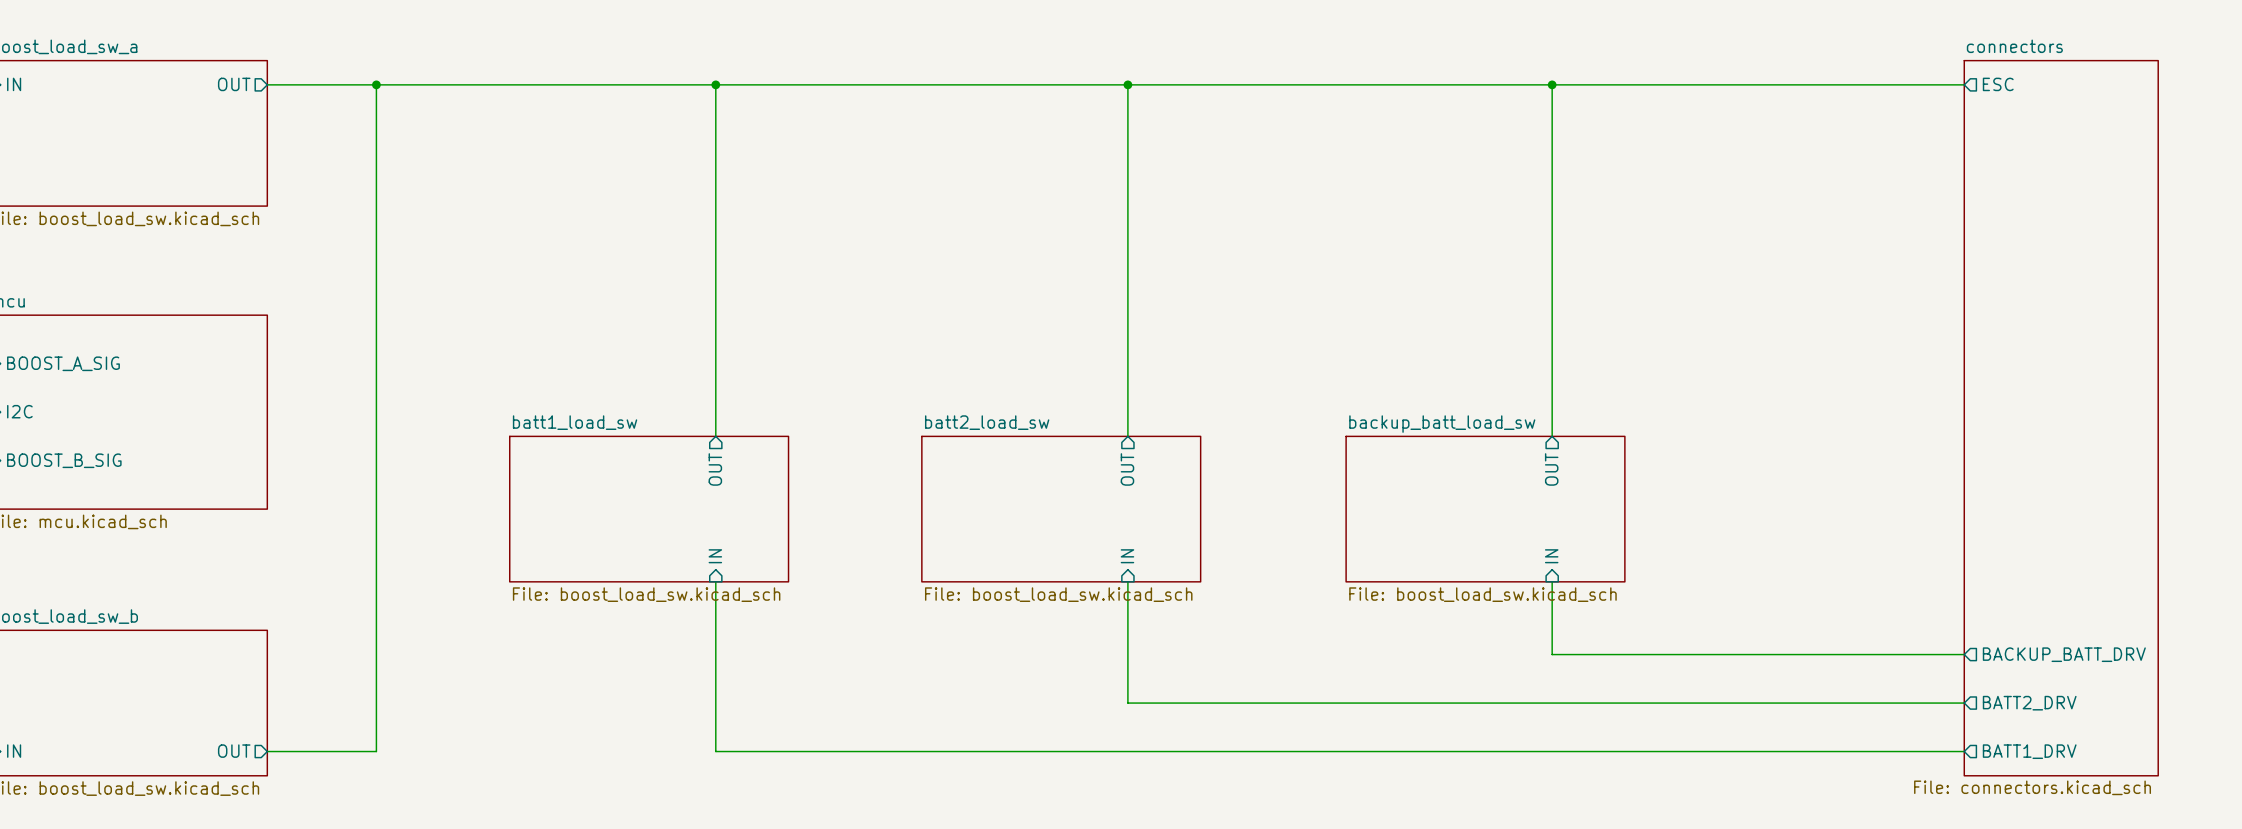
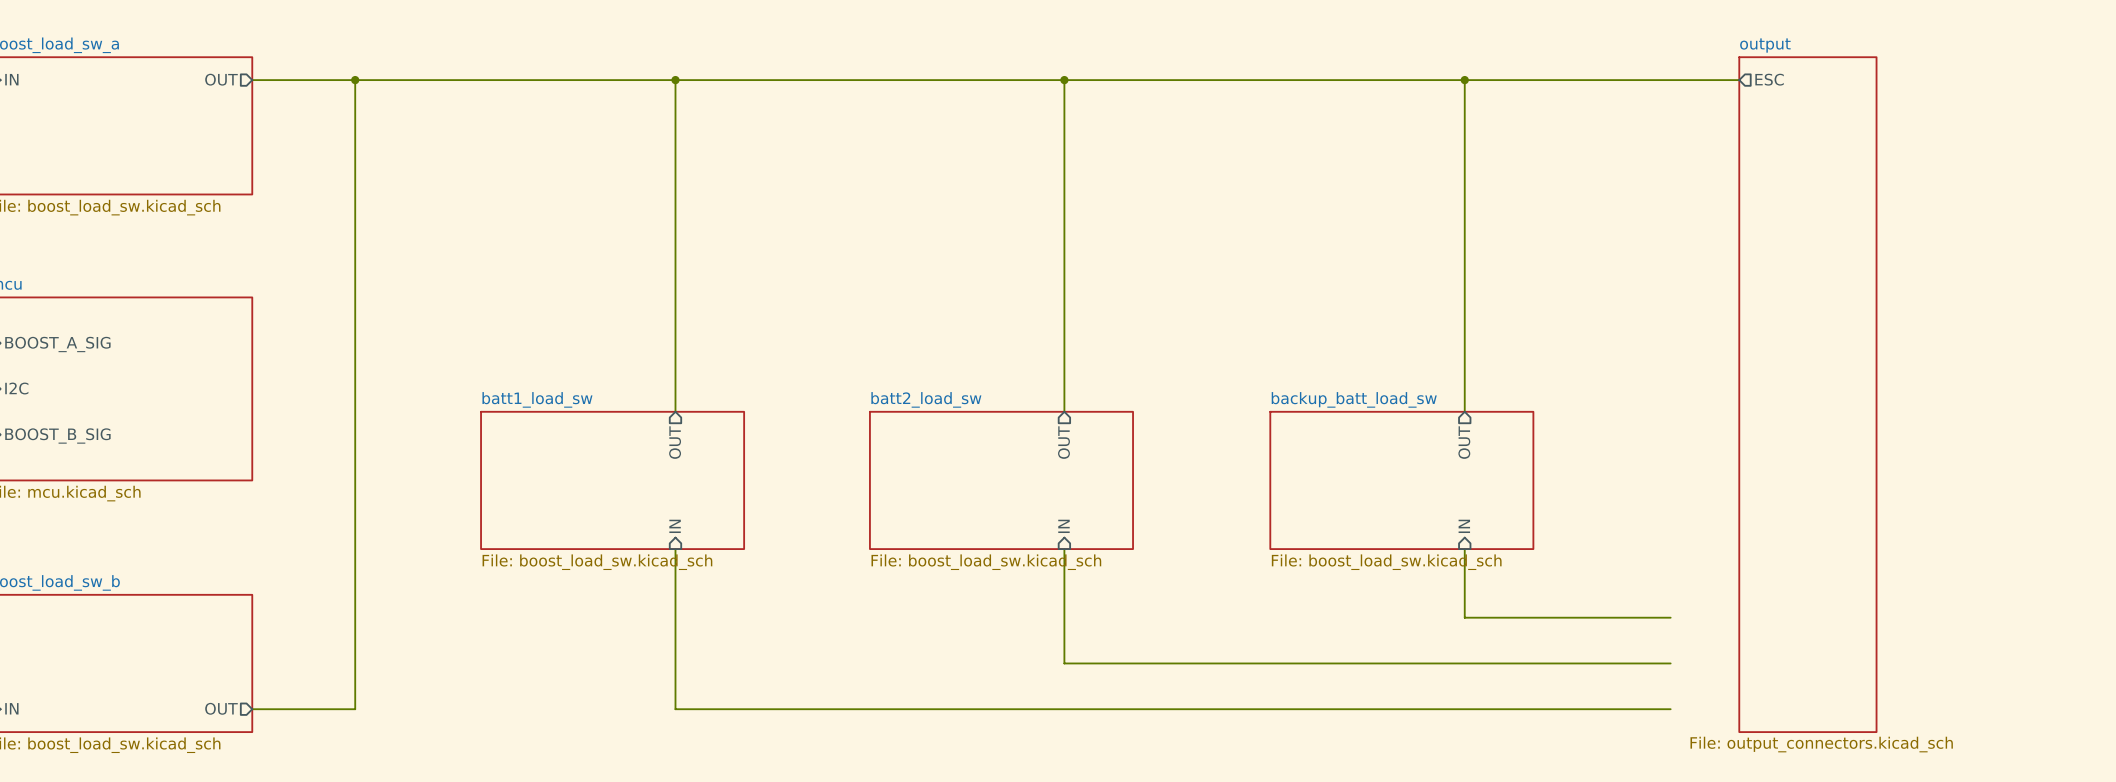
wire: (1843, 84) (1964, 84) -> none
sheet pin position: ESC (1998, 84) -> ESC (1769, 79)
sheet output: none -> File: output_connectors.kicad_sch (1807, 394)
sheet connectors: File: connectors.kicad_sch (2061, 418) -> none
wire: (1770, 654) (1964, 654) -> none
sheet pin: BACKUP_BATT_DRV (2064, 654) -> none
wire: (1770, 703) (1964, 703) -> none
sheet pin: BATT2_DRV (2029, 703) -> none
wire: (1770, 751) (1964, 751) -> none
sheet pin: BATT1_DRV (2029, 751) -> none

